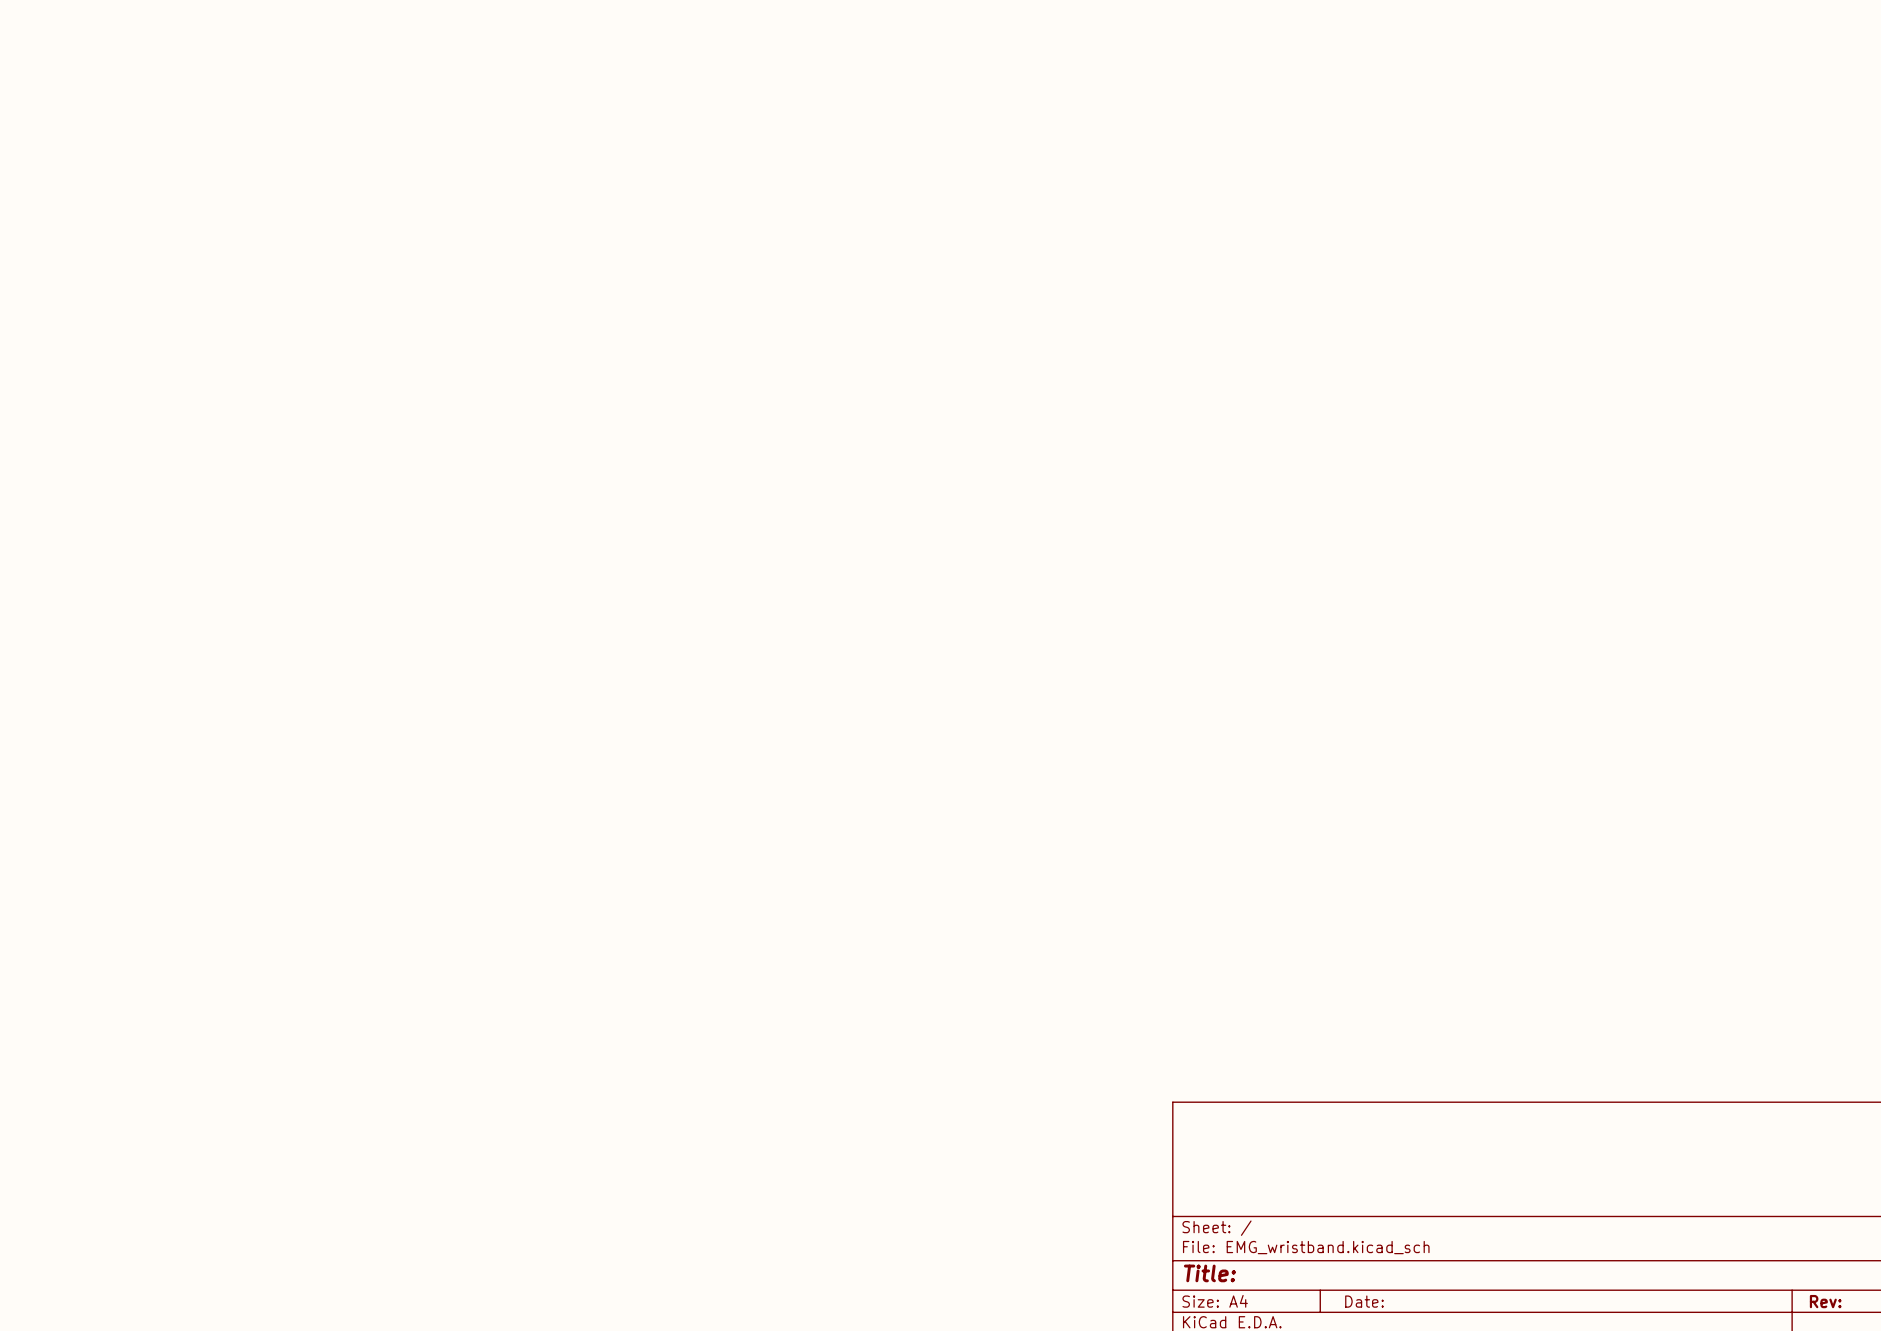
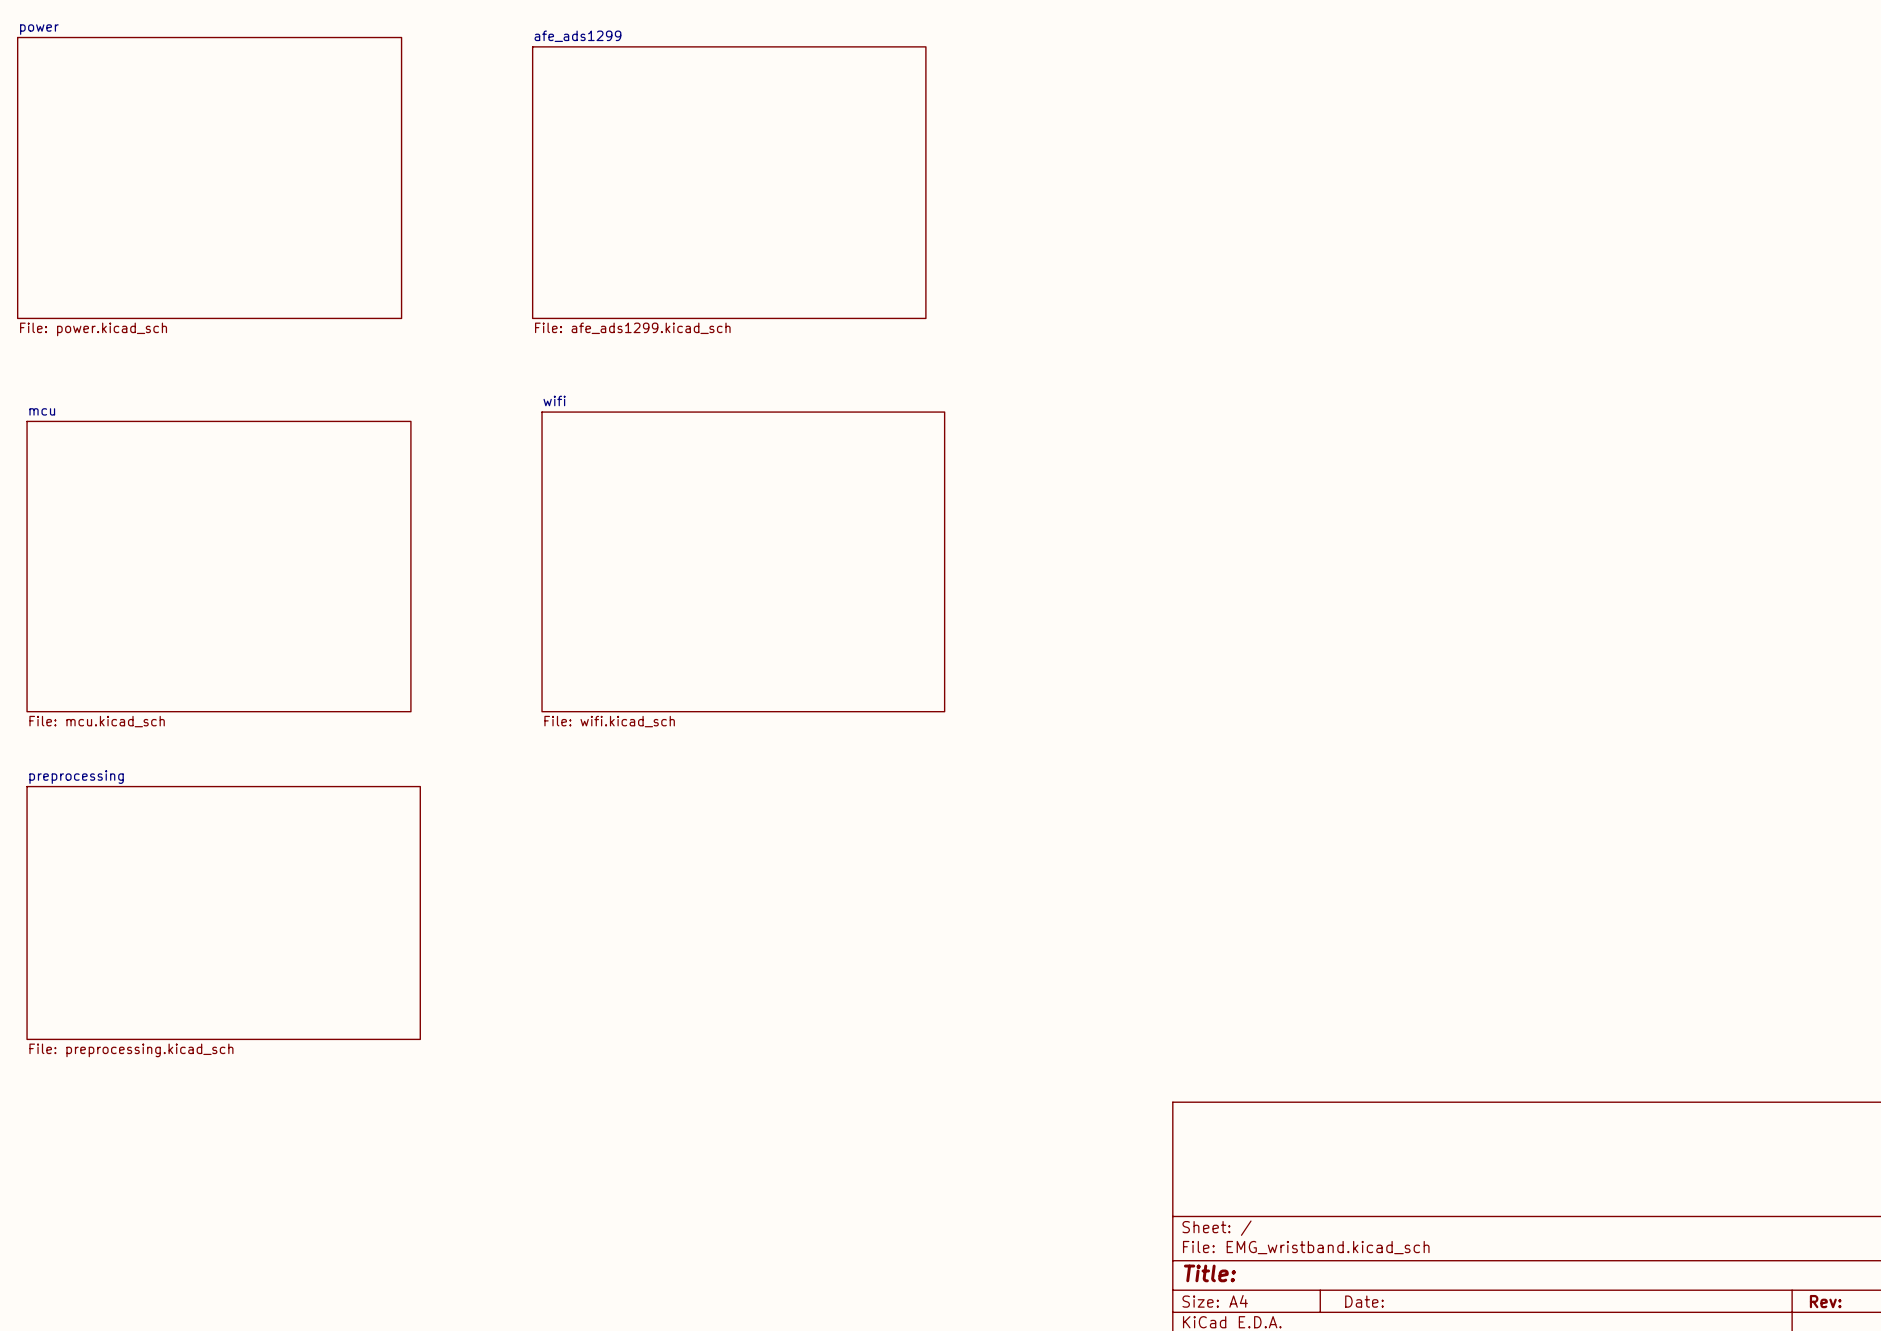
sheet power: none -> File: power.kicad_sch (209, 177)
sheet afe_ads1299: none -> File: afe_ads1299.kicad_sch (729, 182)
sheet wifi: none -> File: wifi.kicad_sch (743, 561)
sheet mcu: none -> File: mcu.kicad_sch (218, 566)
sheet preprocessing: none -> File: preprocessing.kicad_sch (223, 912)

